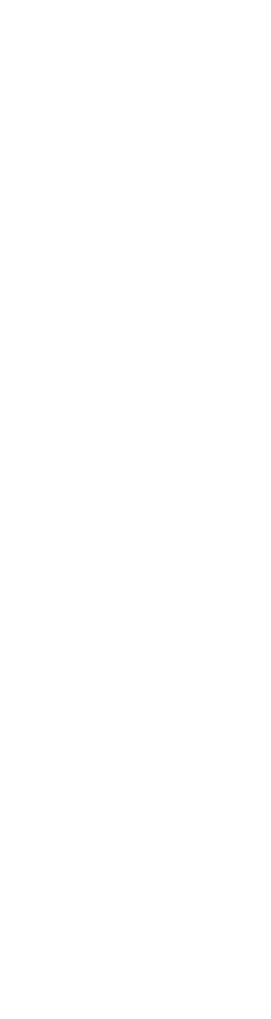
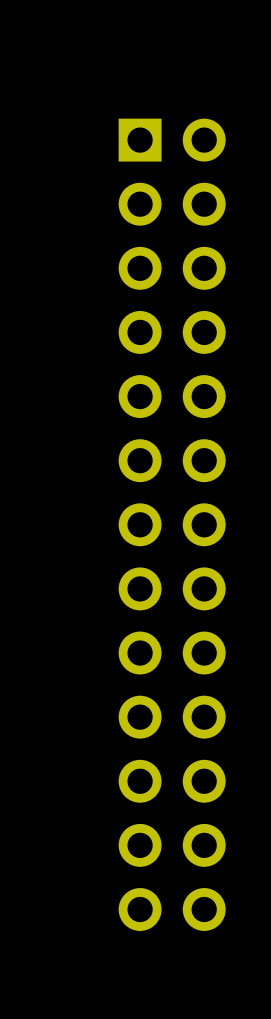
part: none -> (172, 524)

